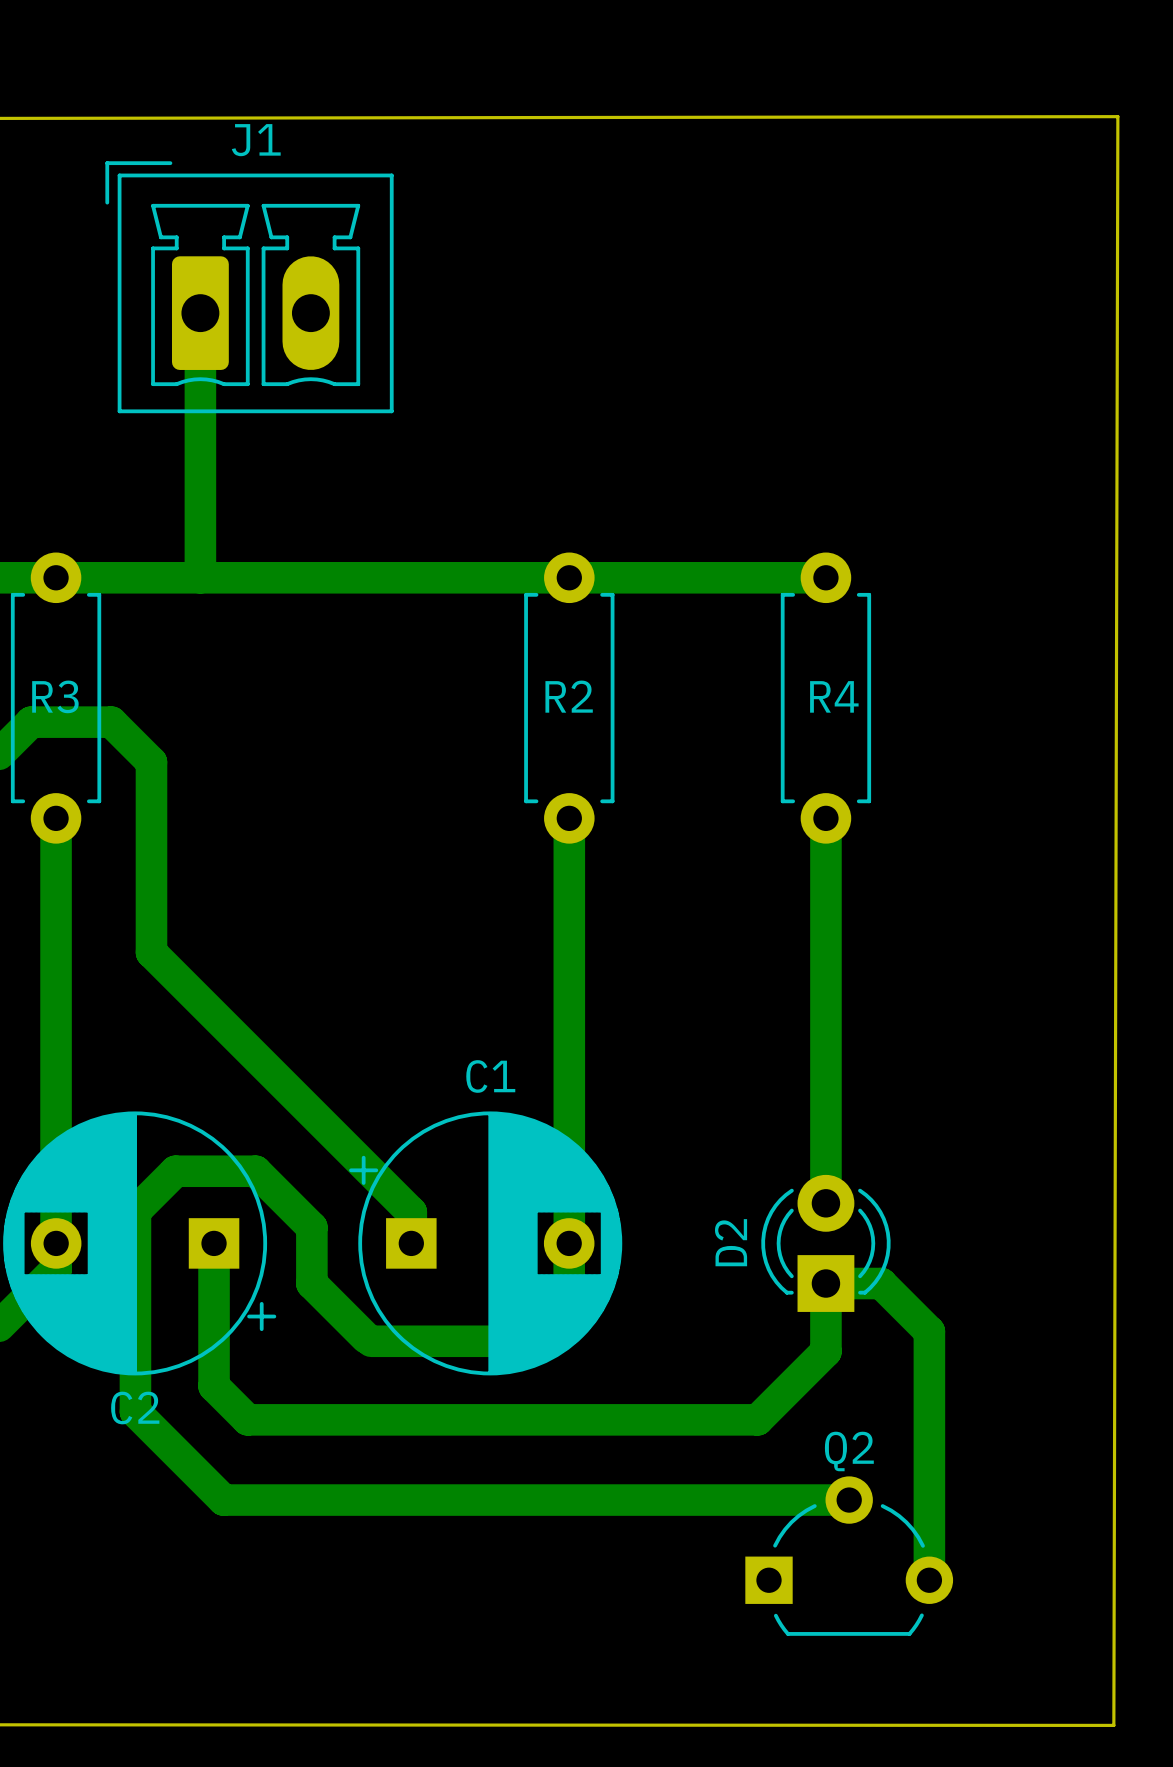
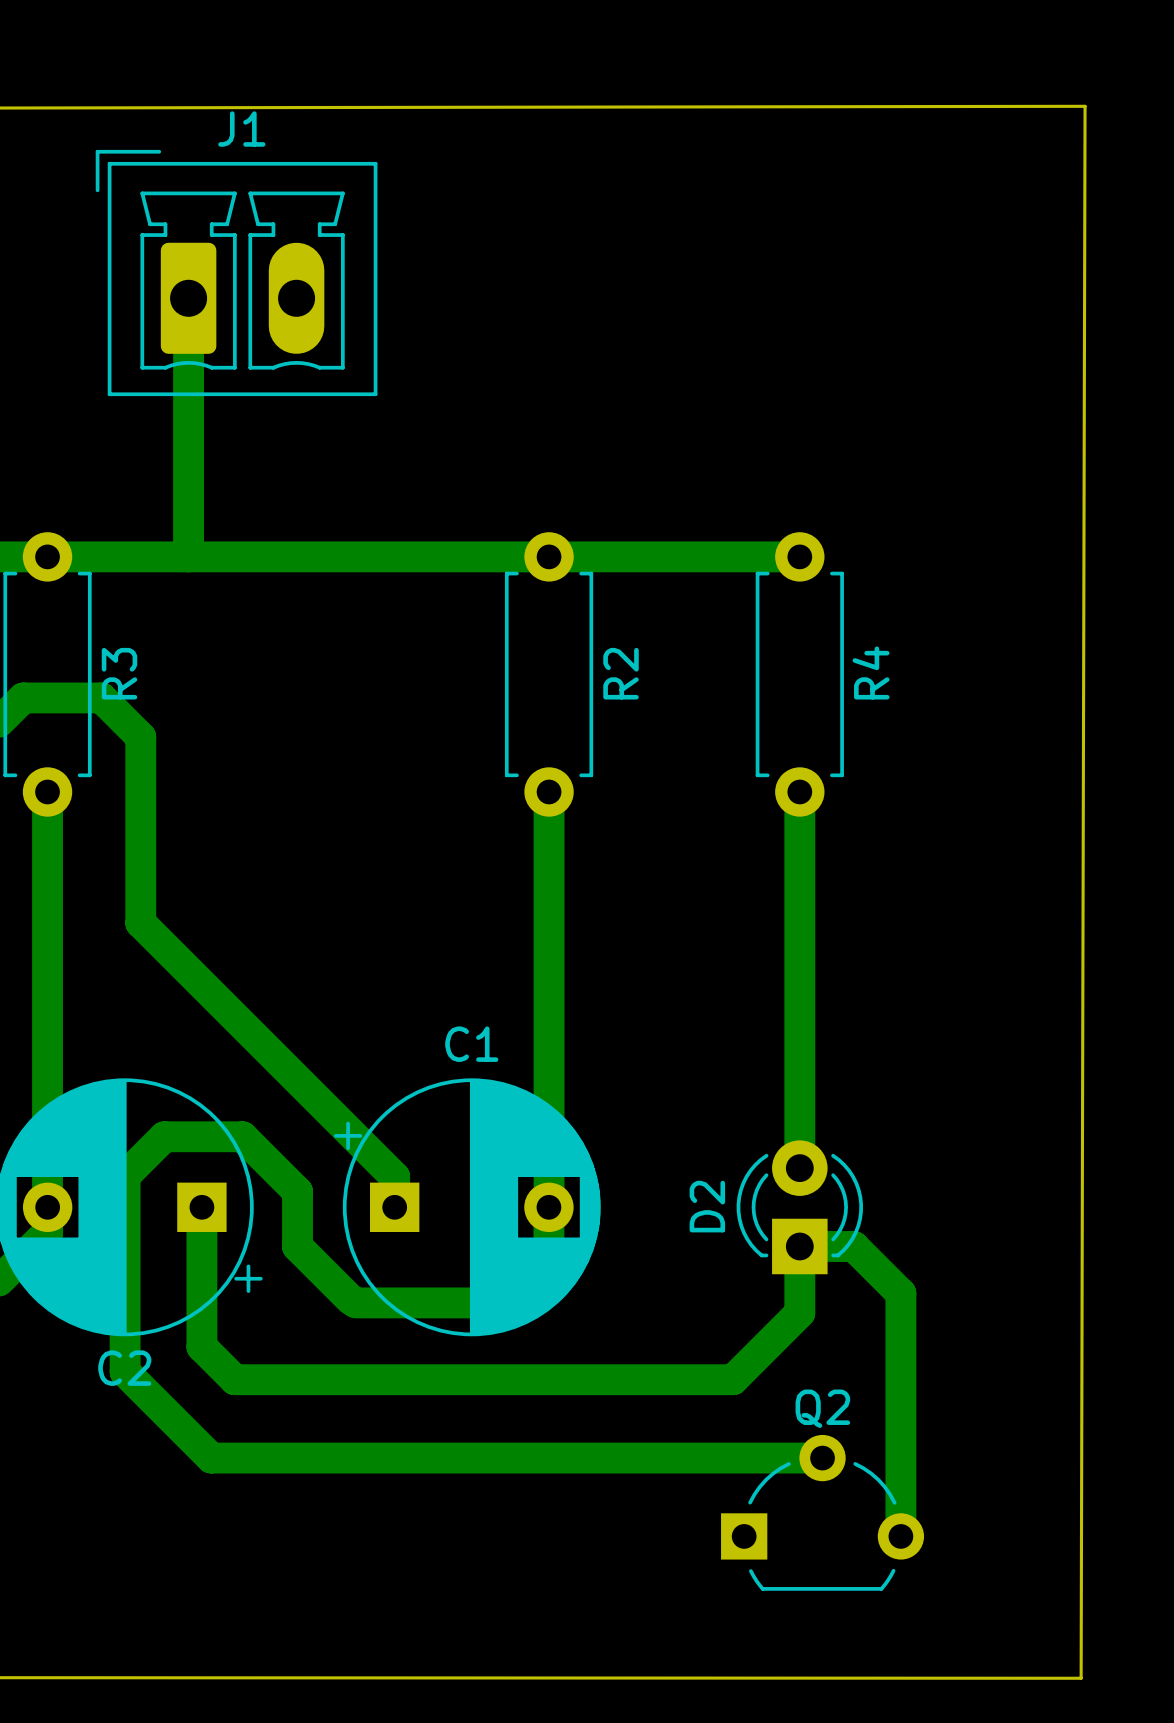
R3 name rotation: 0° (55, 696) -> 90° counterclockwise (119, 673)
R2 name rotation: 0° (569, 696) -> 90° counterclockwise (621, 673)
R4 name rotation: 0° (834, 696) -> 90° counterclockwise (871, 672)

